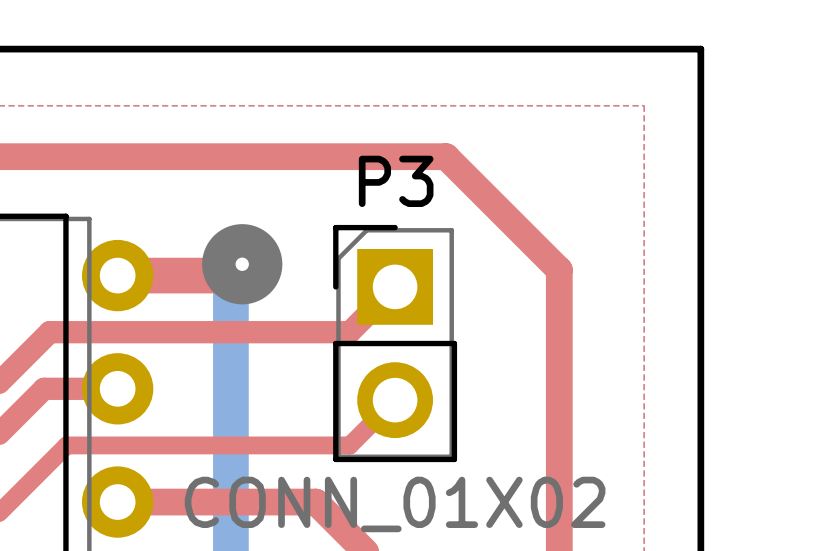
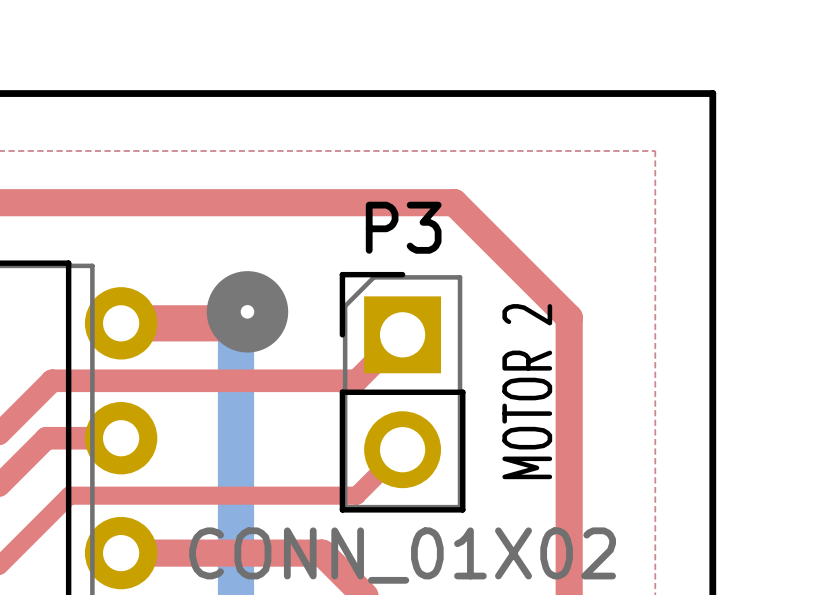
text: none -> MOTOR 2 (527, 391)

